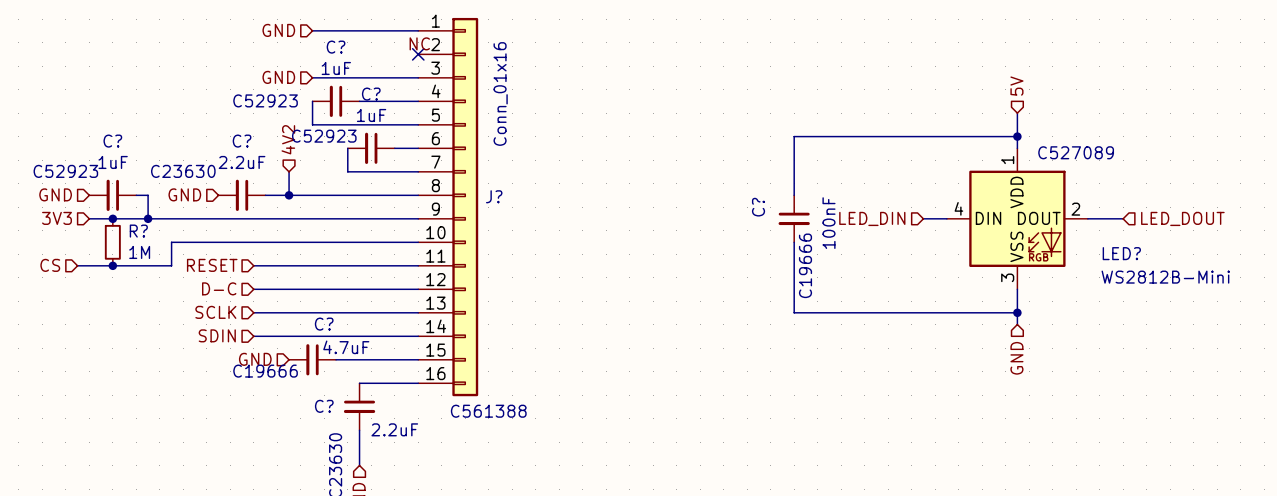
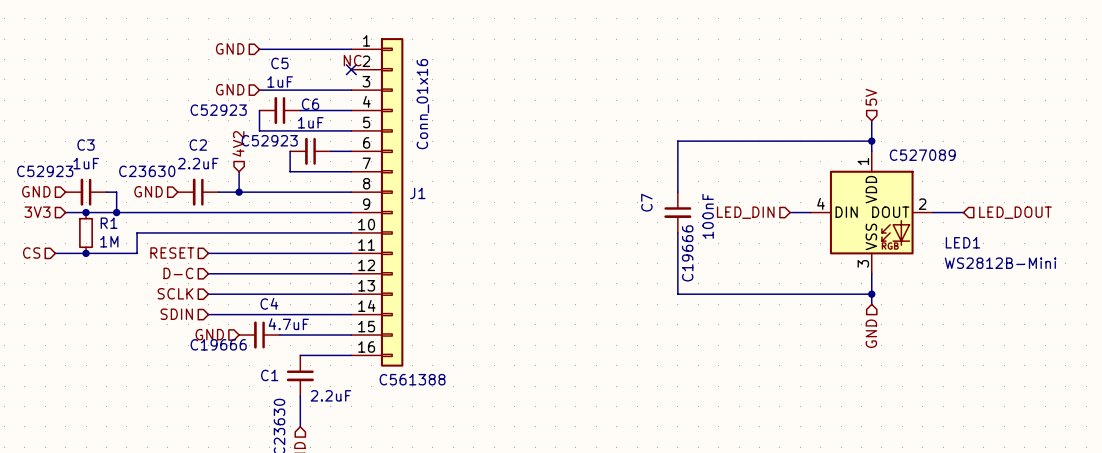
C? name: C? (336, 47) -> C5 (279, 63)
C? name: C? (371, 94) -> C6 (310, 104)
C? name: C? (112, 141) -> C3 (86, 145)
C? name: C? (242, 141) -> C2 (198, 145)
J? name: J? (494, 196) -> J1 (417, 193)
C? name: C? (758, 207) -> C7 (646, 202)
R? name: R? (138, 231) -> R1 (109, 223)
LED? name: LED? (1121, 253) -> LED1 (962, 242)
C? name: C? (324, 324) -> C4 (269, 303)
C? name: C? (324, 406) -> C1 (269, 375)

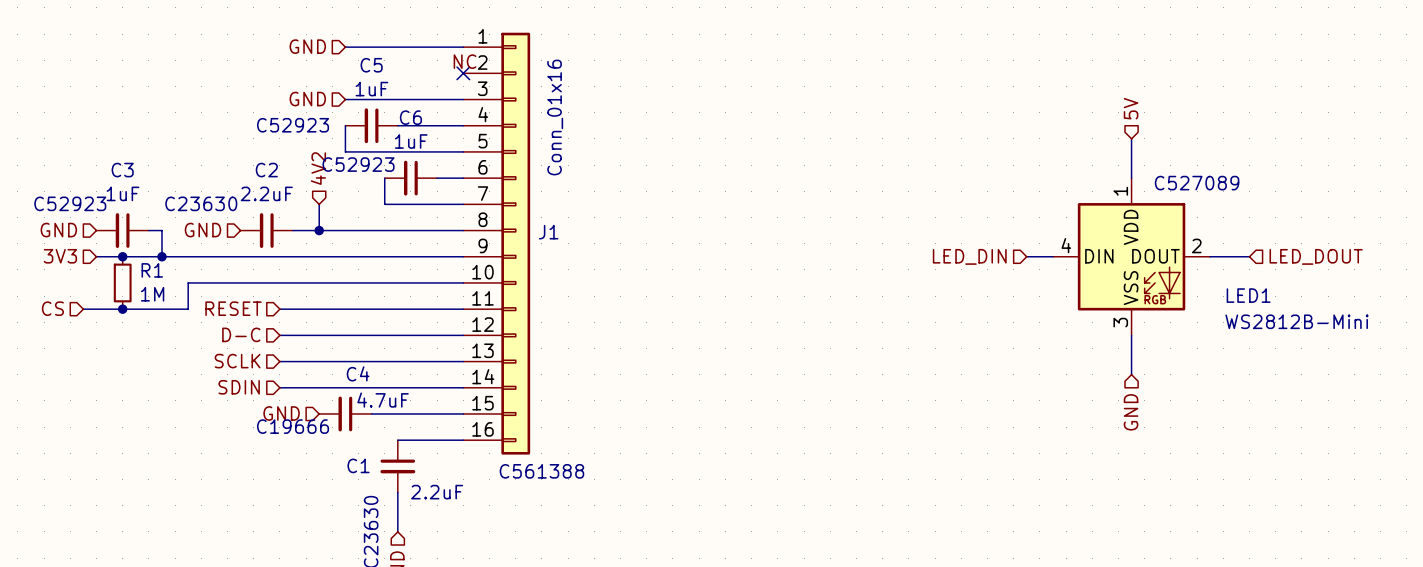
wire: (871, 141) (677, 141) (677, 192) -> none
junction: (871, 141) -> none
C7: 100nF (677, 212) -> none
wire: (677, 232) (677, 294) (871, 294) -> none
junction: (871, 294) -> none

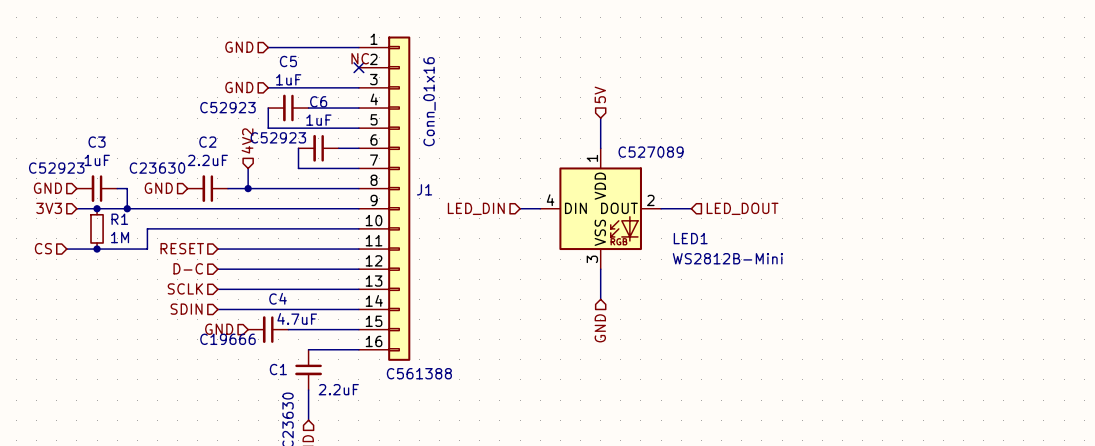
hierarchical label: none -> 5V (600, 94)
hierarchical label: 5V (1131, 108) -> none
wire: none -> (600, 118) (600, 148)
wire: (1131, 138) (1131, 178) -> none
hierarchical label: none -> LED_DIN (476, 208)
wire: none -> (520, 208) (540, 208)
wire: none -> (661, 208) (691, 208)
hierarchical label: LED_DIN (969, 256) -> LED_DOUT (742, 208)
wire: (1026, 256) (1052, 256) -> none
LED1 position: (1131, 256) -> (600, 208)
wire: (1210, 256) (1249, 256) -> none
hierarchical label: LED_DOUT (1316, 256) -> none
wire: none -> (600, 269) (600, 299)
wire: (1131, 335) (1131, 374) -> none
hierarchical label: none -> GND (600, 328)
hierarchical label: GND (1131, 412) -> none

